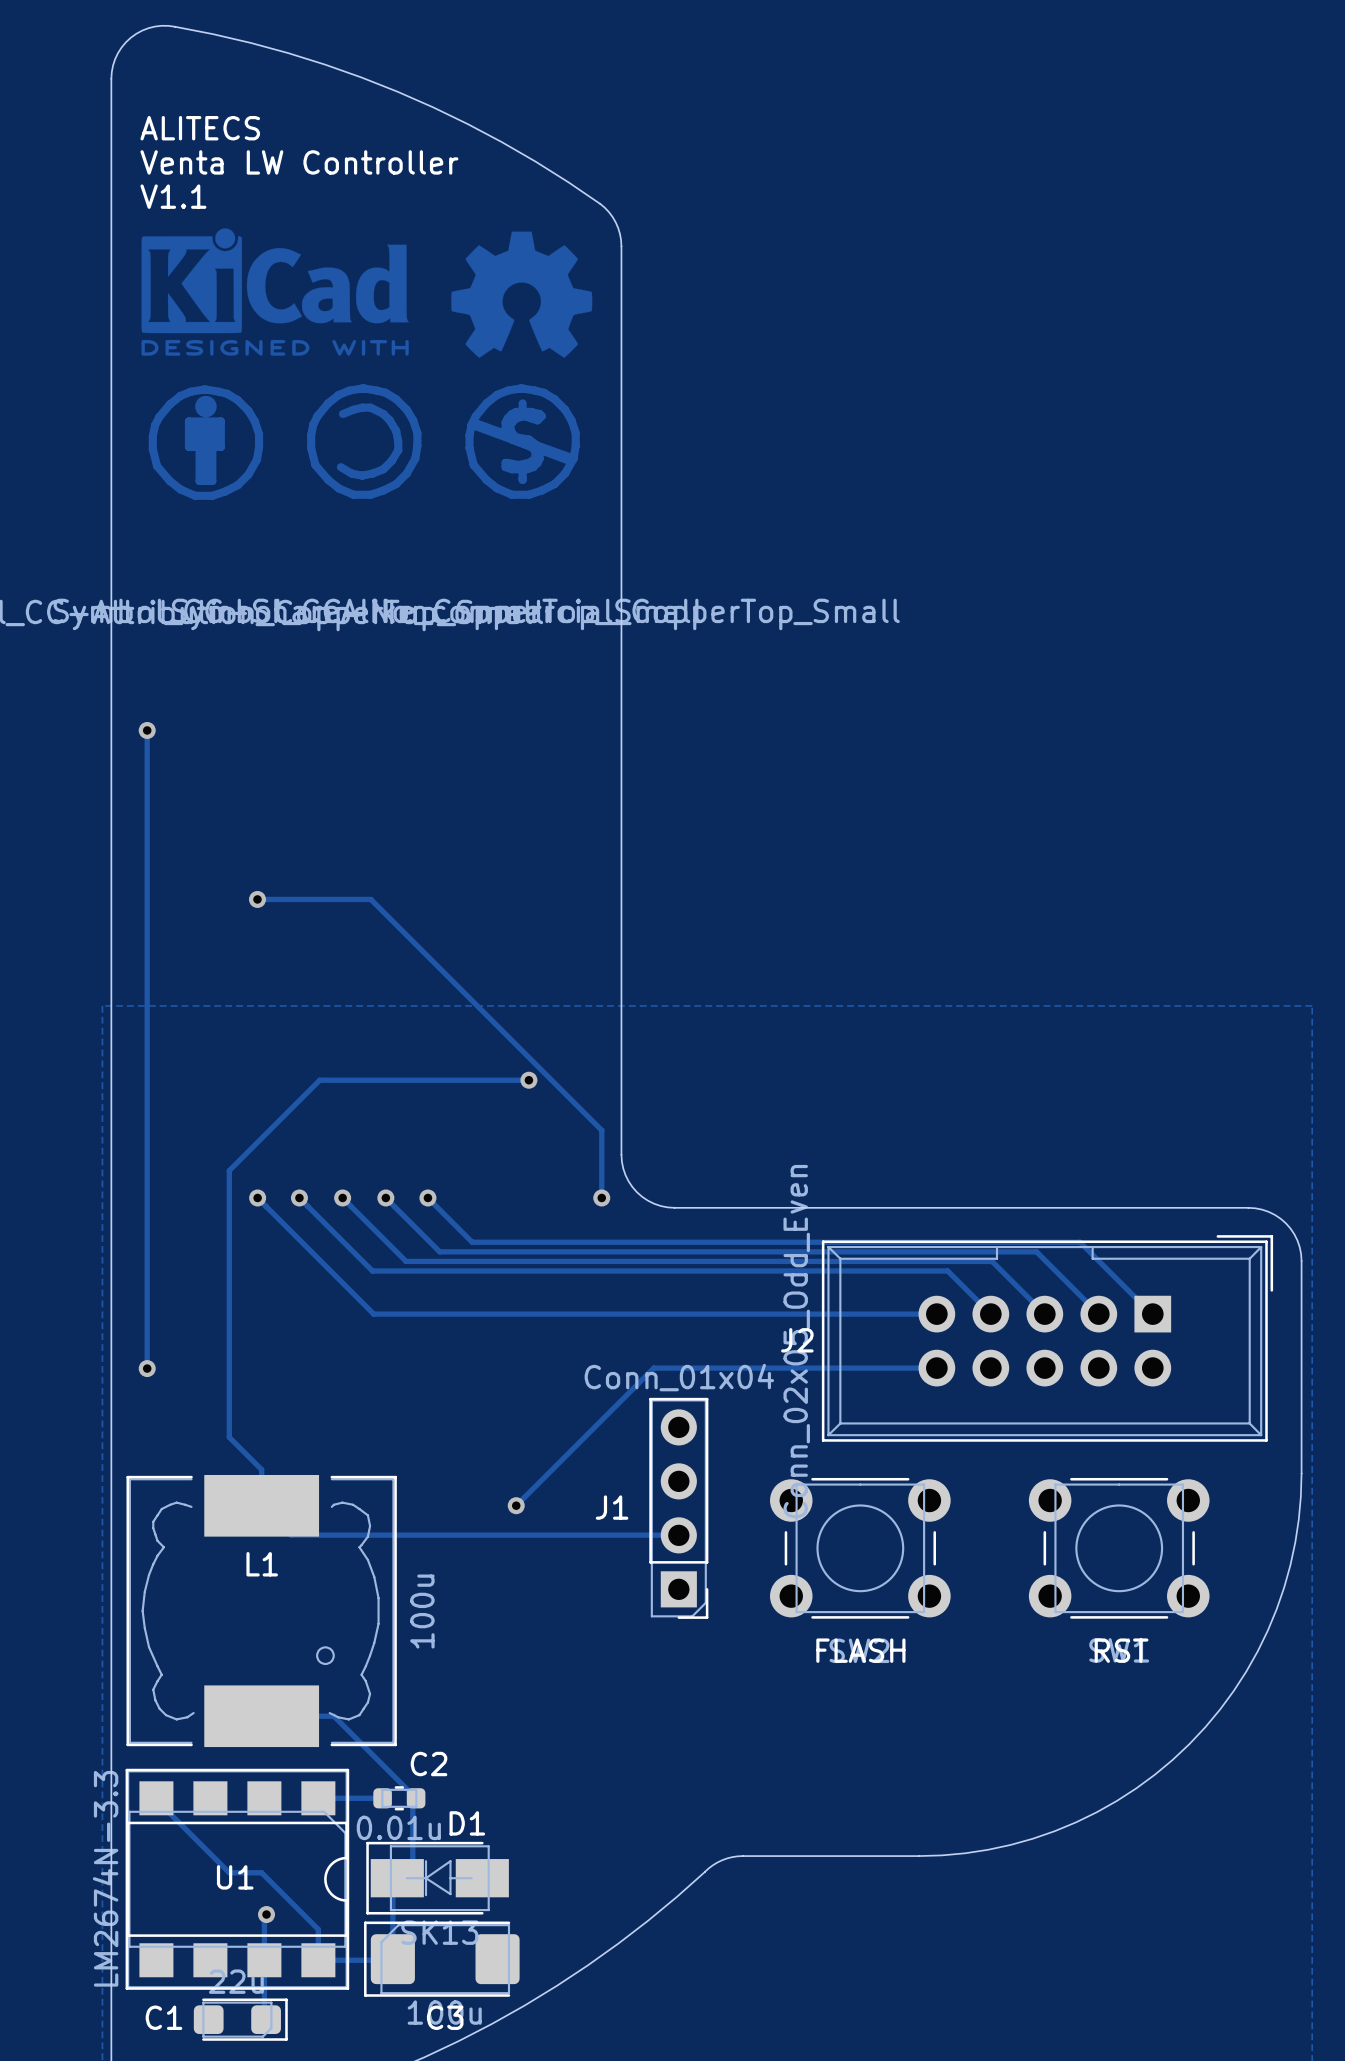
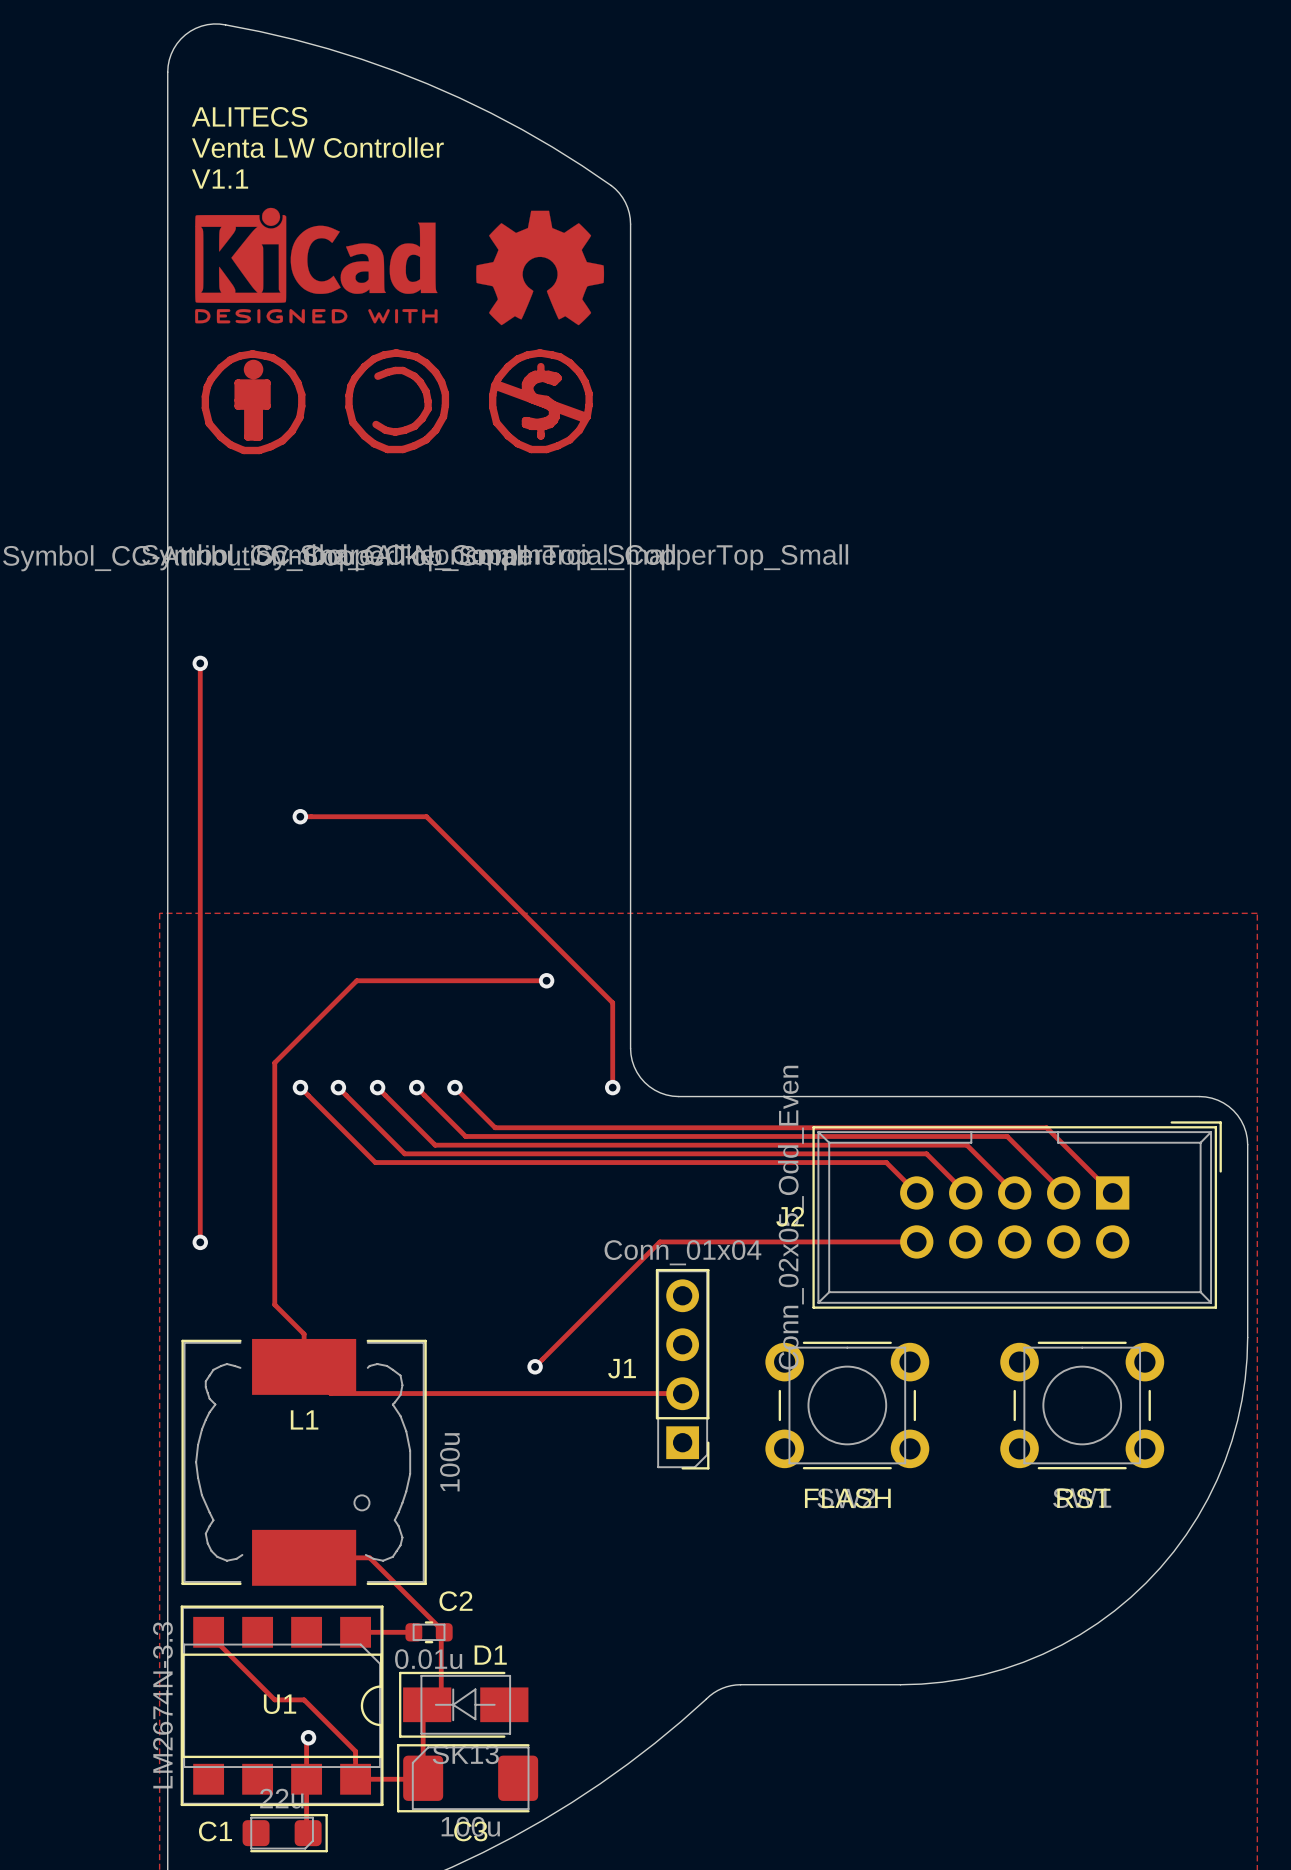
track: (370, 899) (601, 1130) -> (403, 816) (426, 816) (612, 1002) (612, 1026)
track: (340, 1280) (373, 1314) (936, 1314) -> (375, 1162) (886, 1162) (916, 1192)

